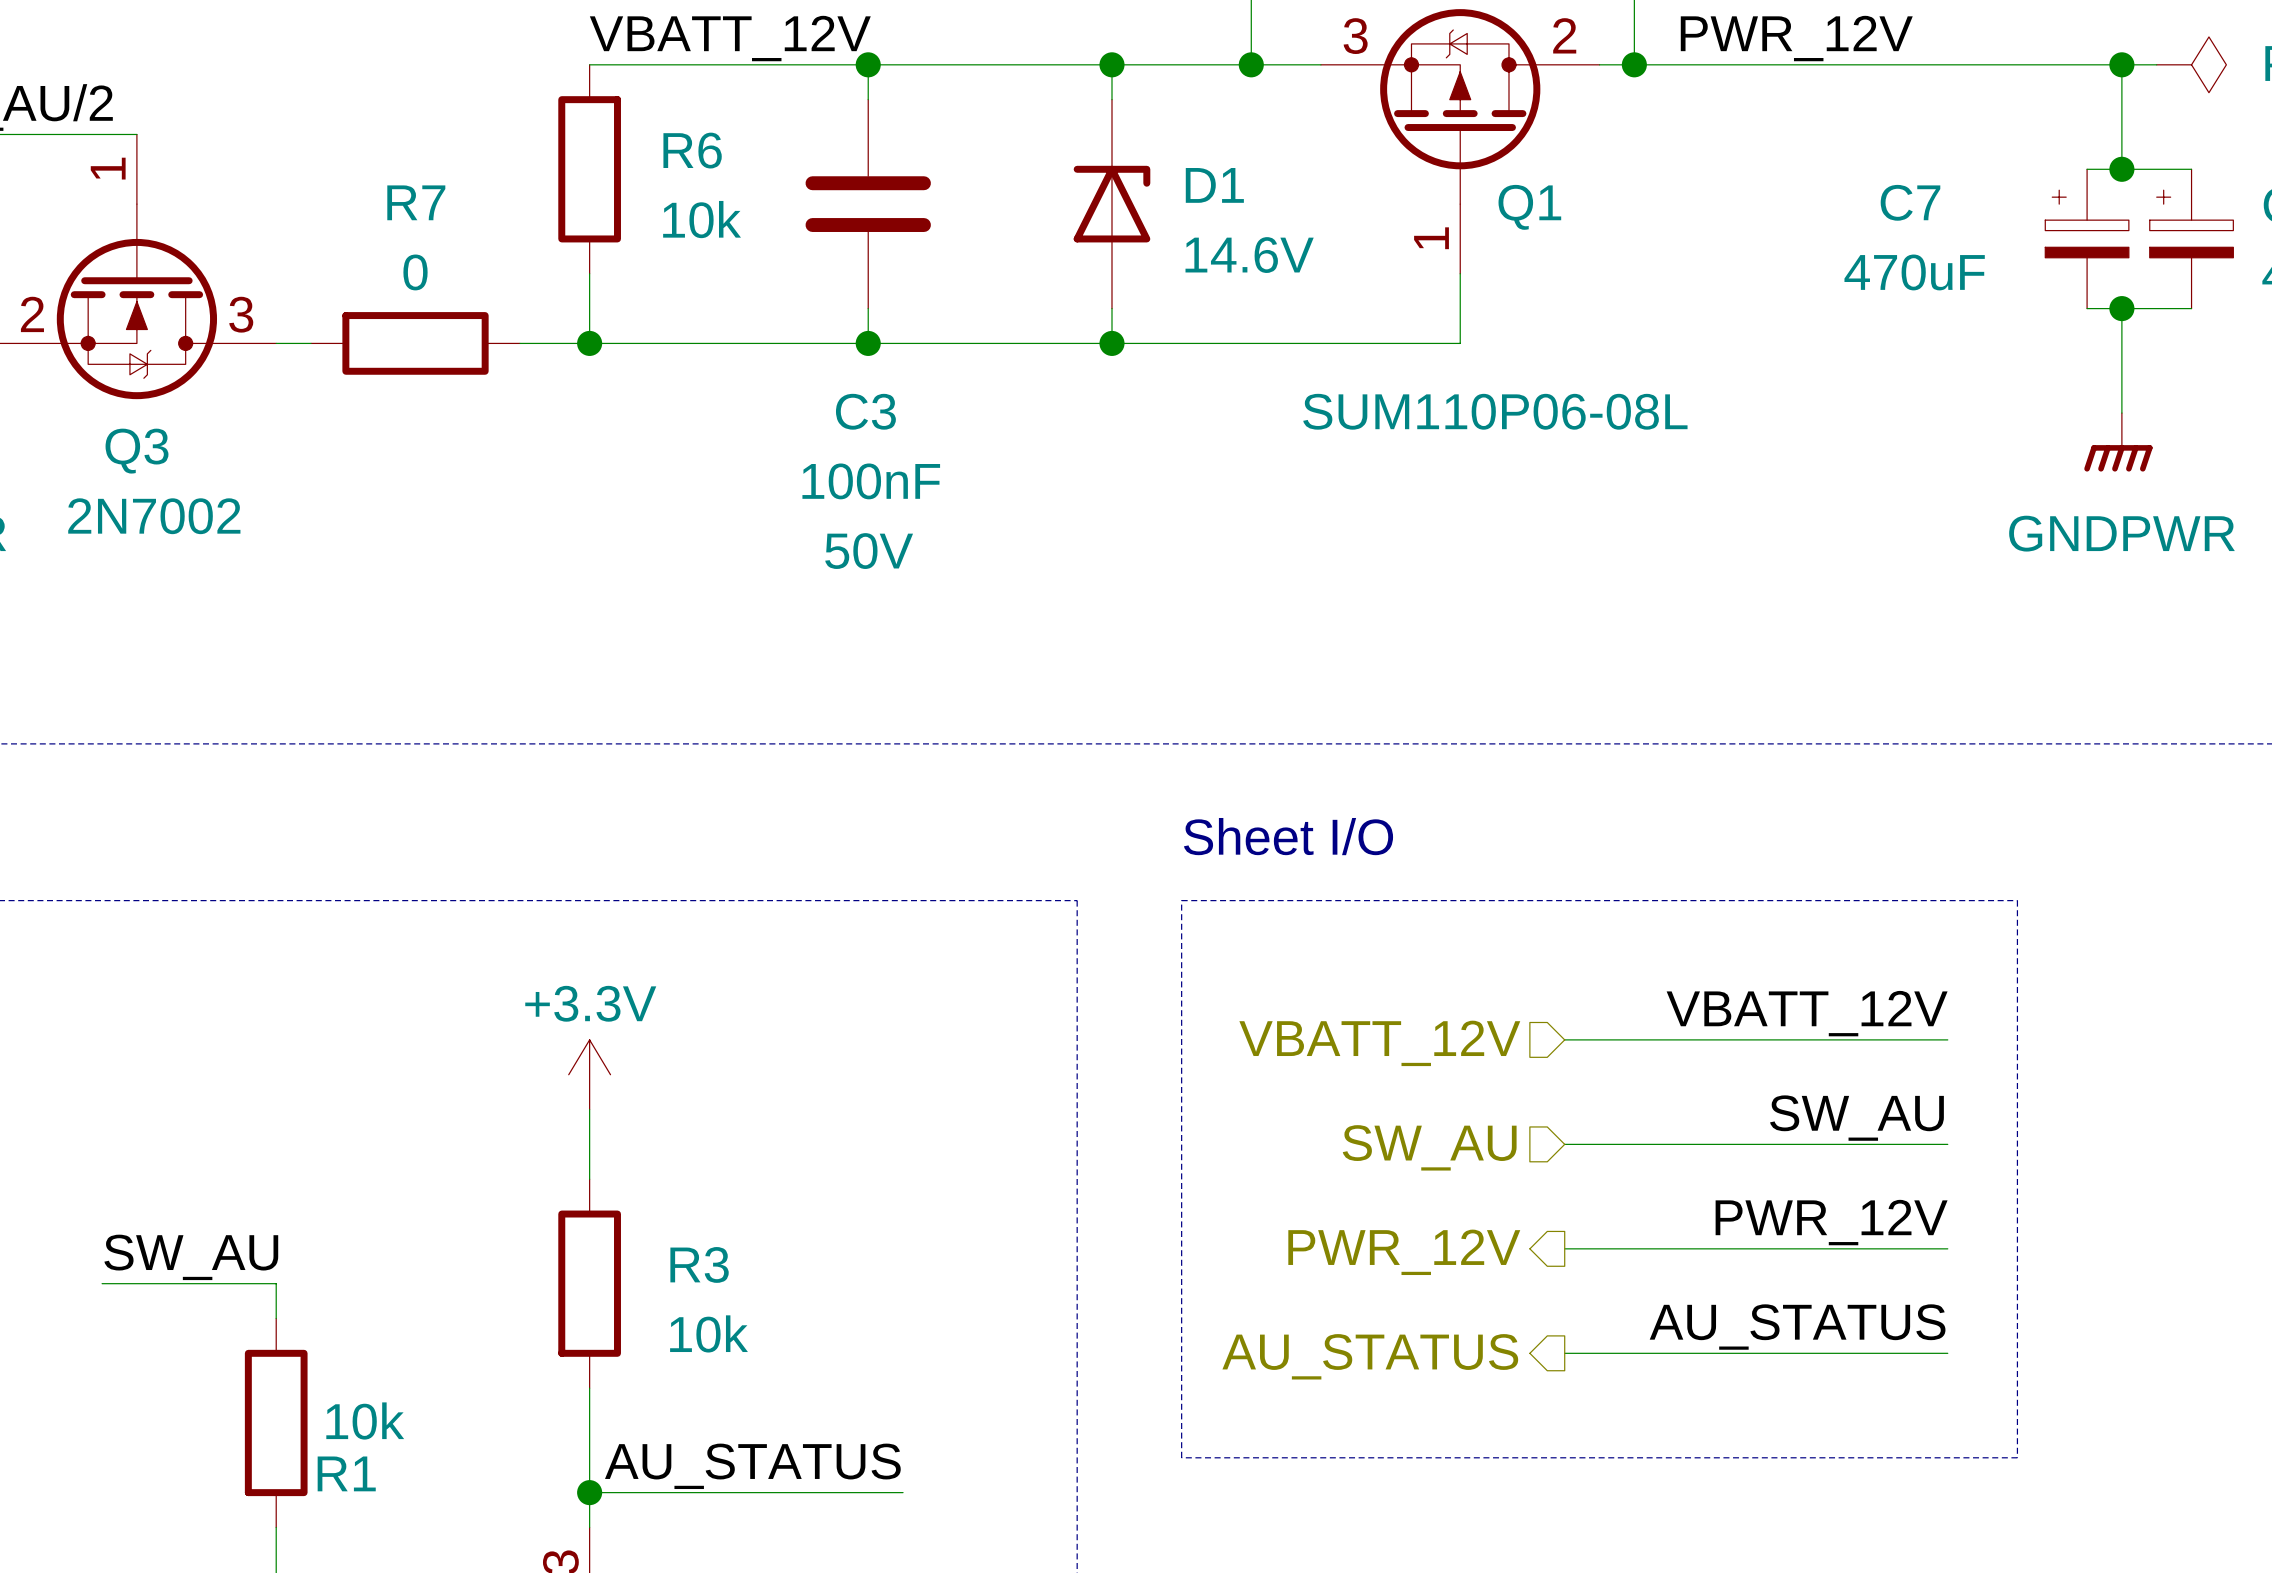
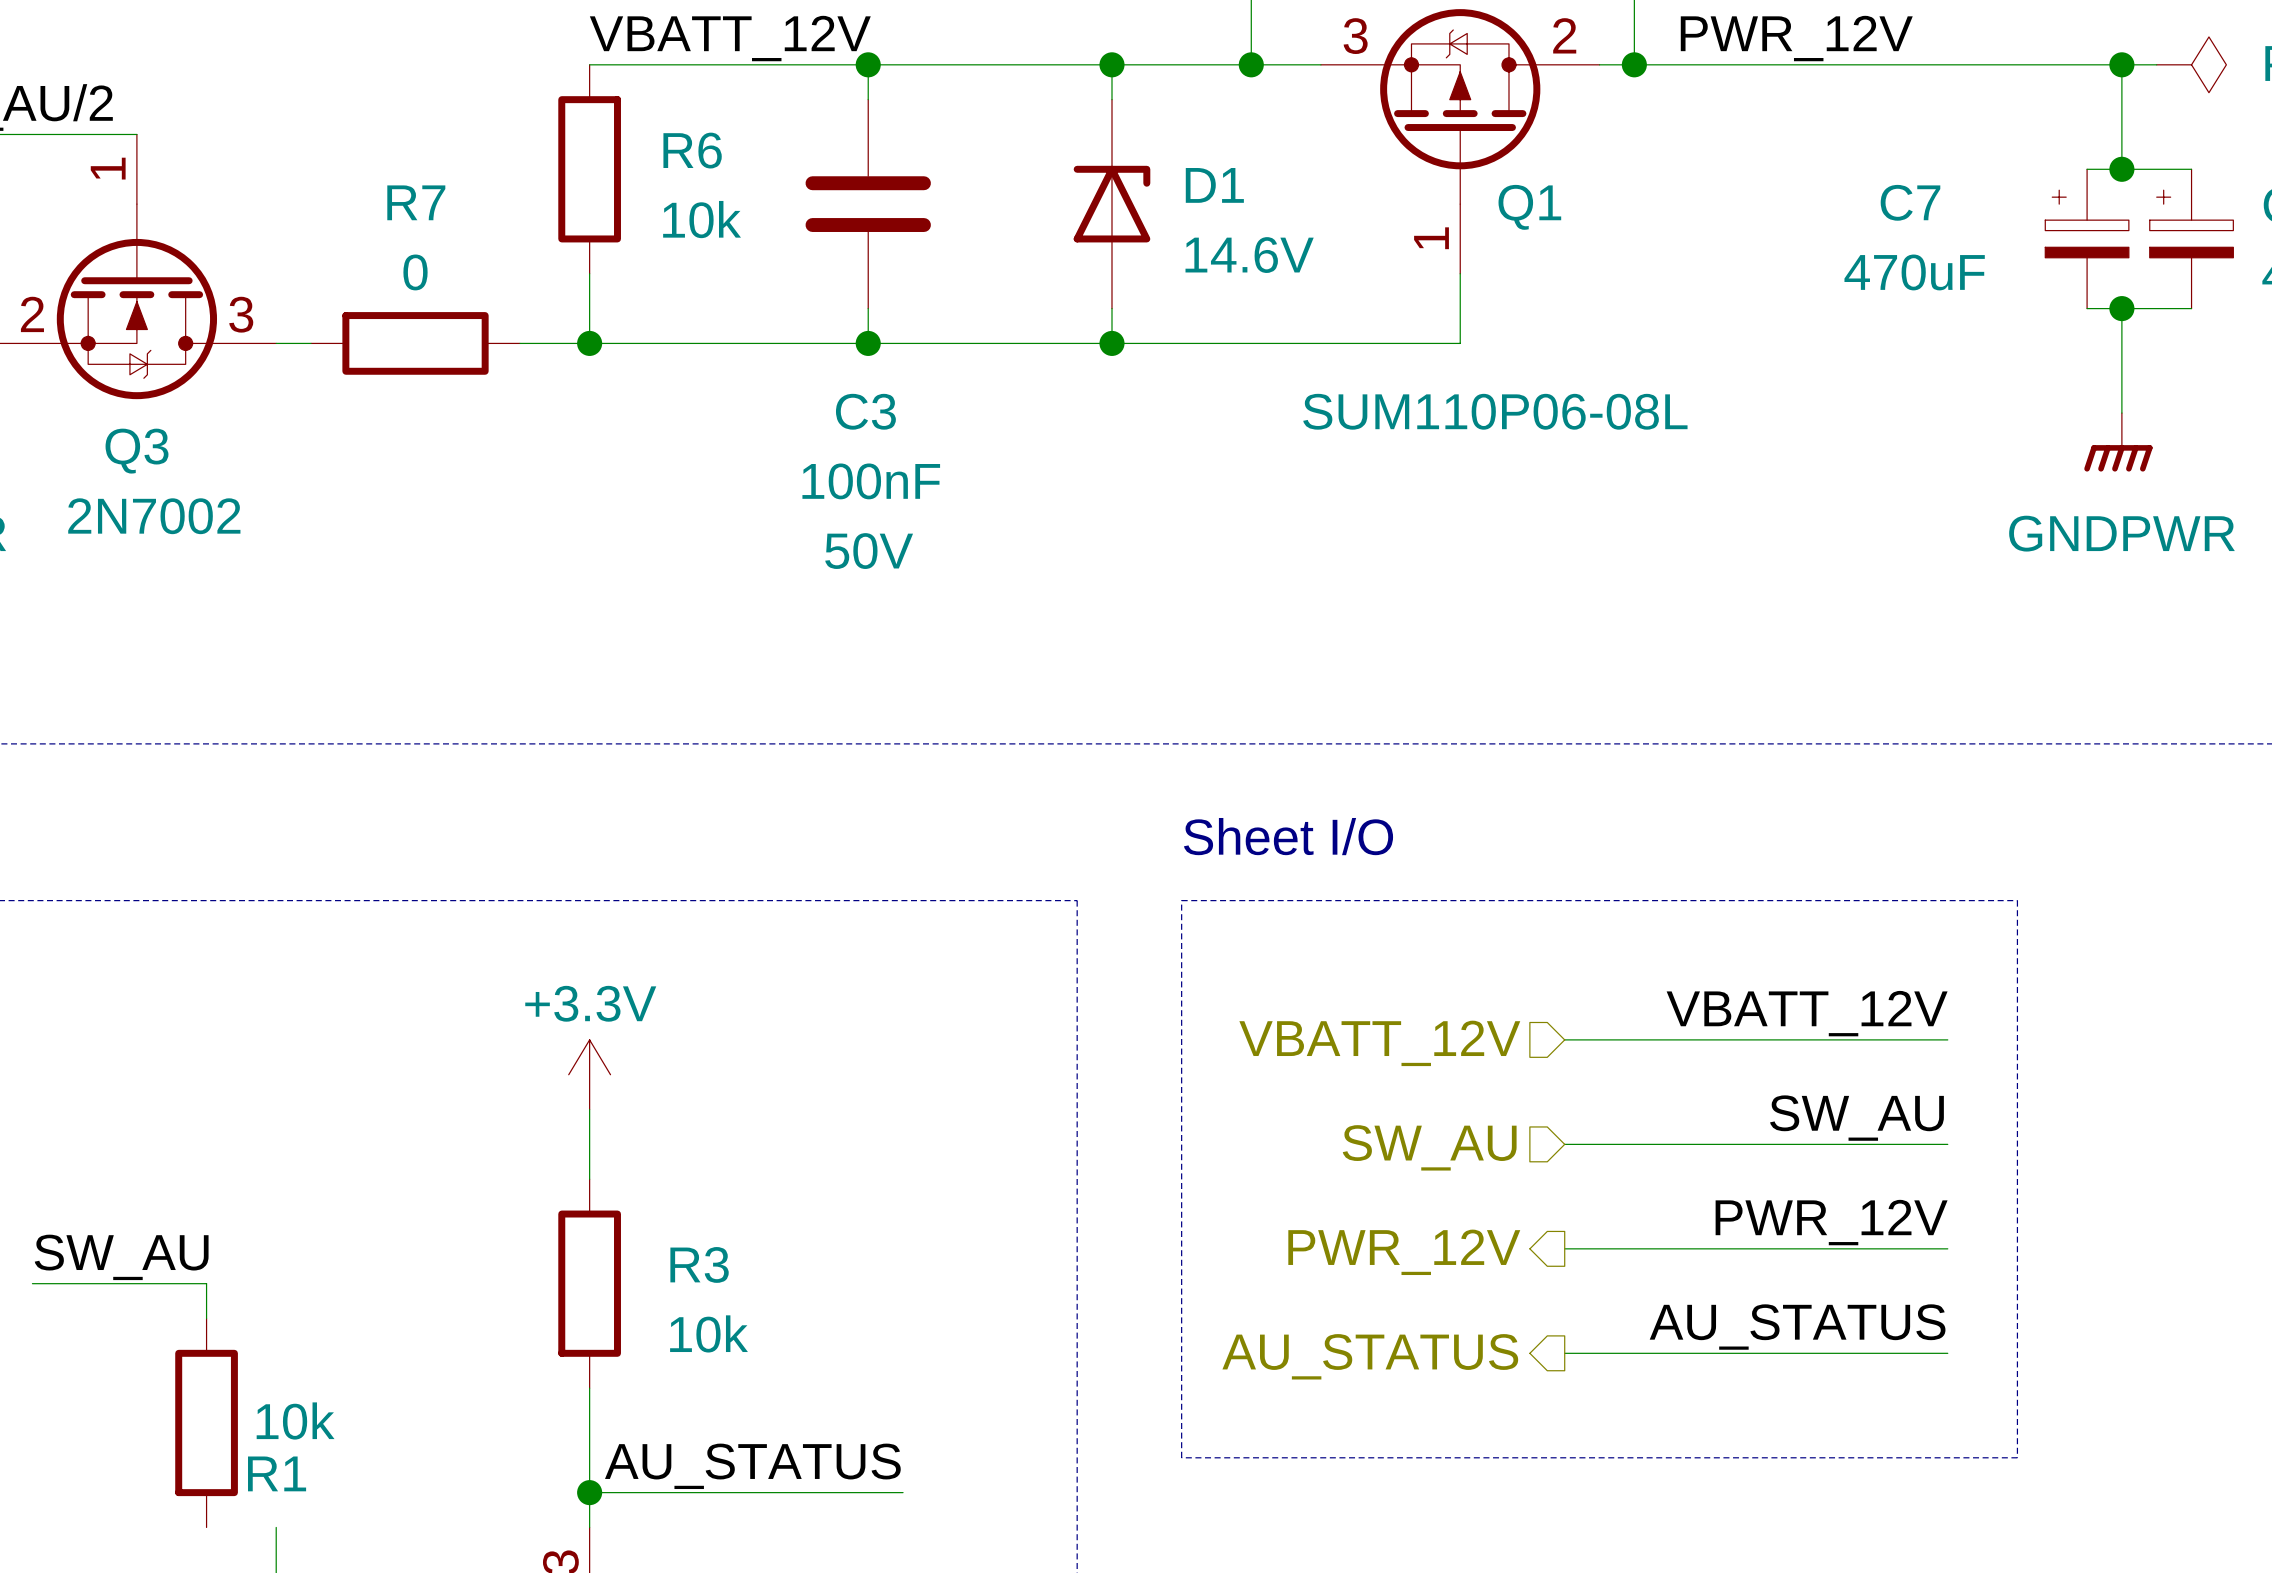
label position: SW_AU (191, 1257) -> SW_AU (121, 1257)
wire: none -> (32, 1283) (102, 1283)
wire: (206, 1283) (276, 1283) (276, 1318) -> (206, 1283) (206, 1318)
R1 position: (276, 1422) -> (206, 1422)

